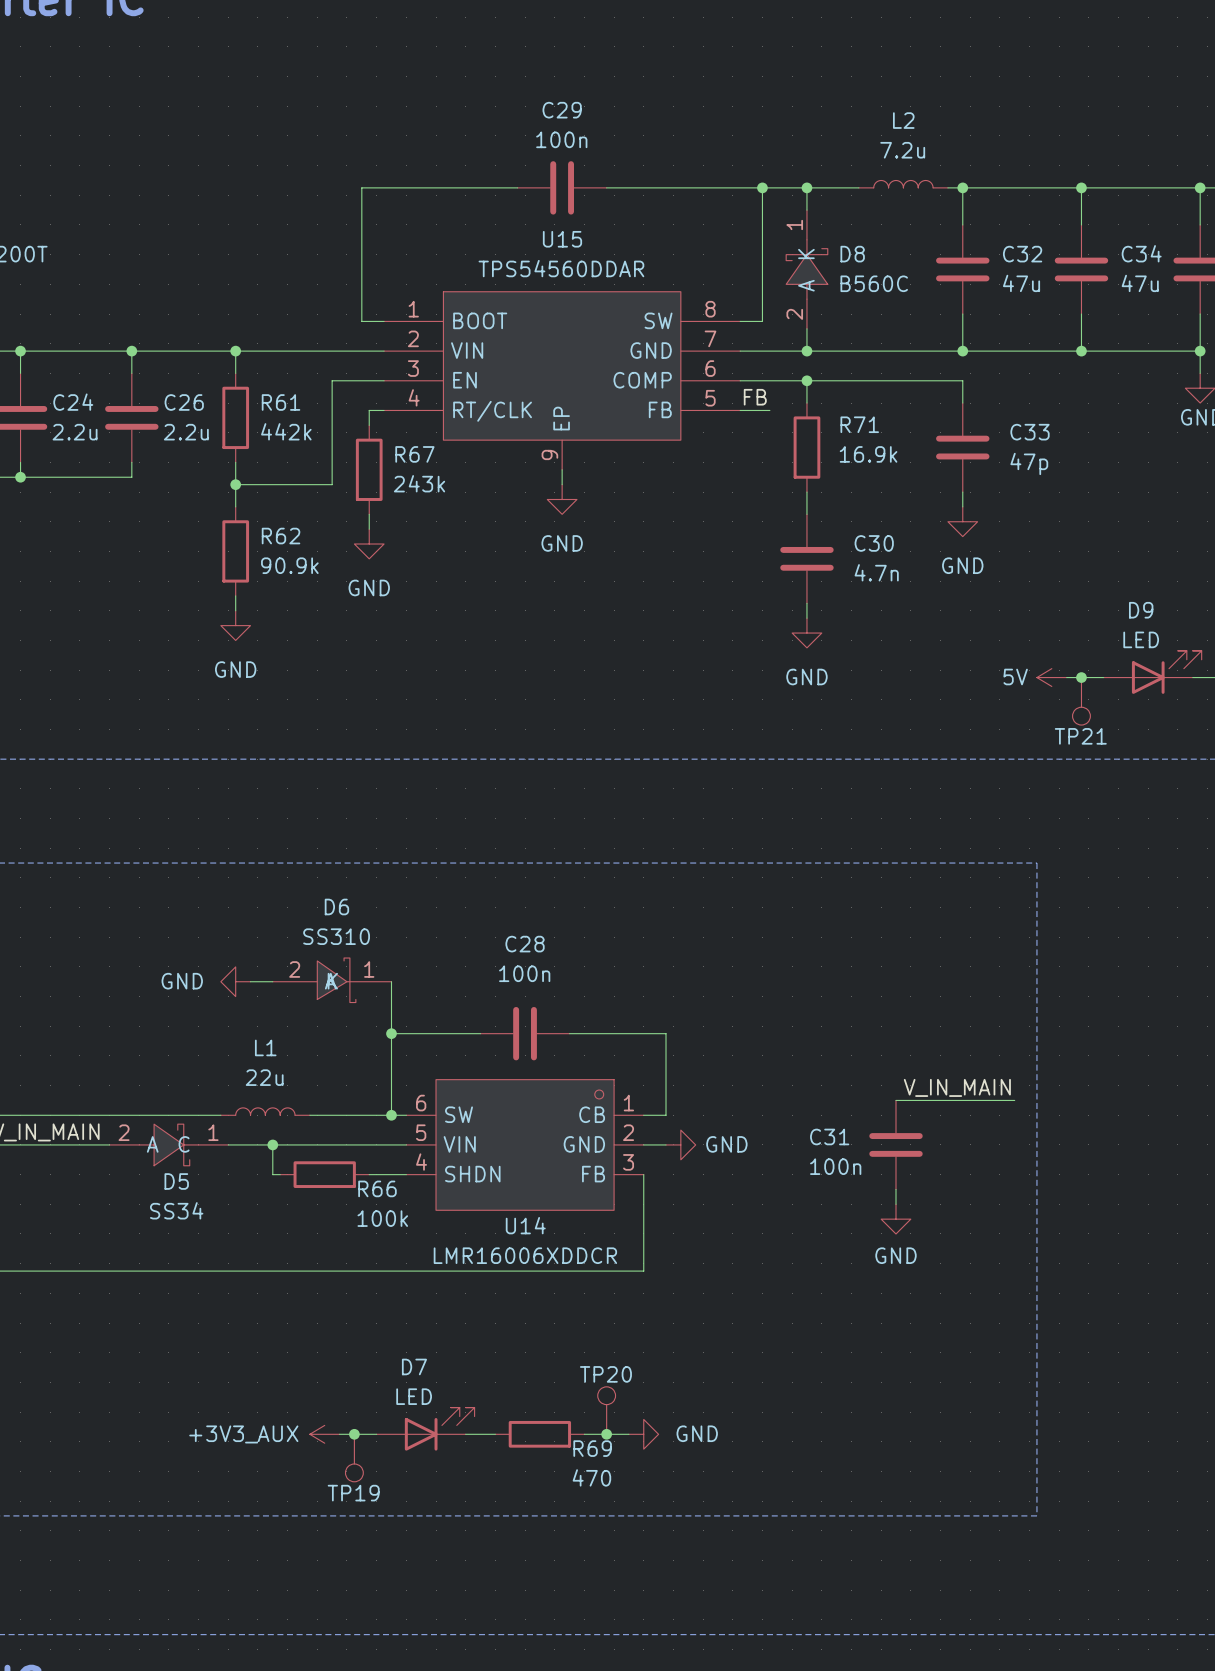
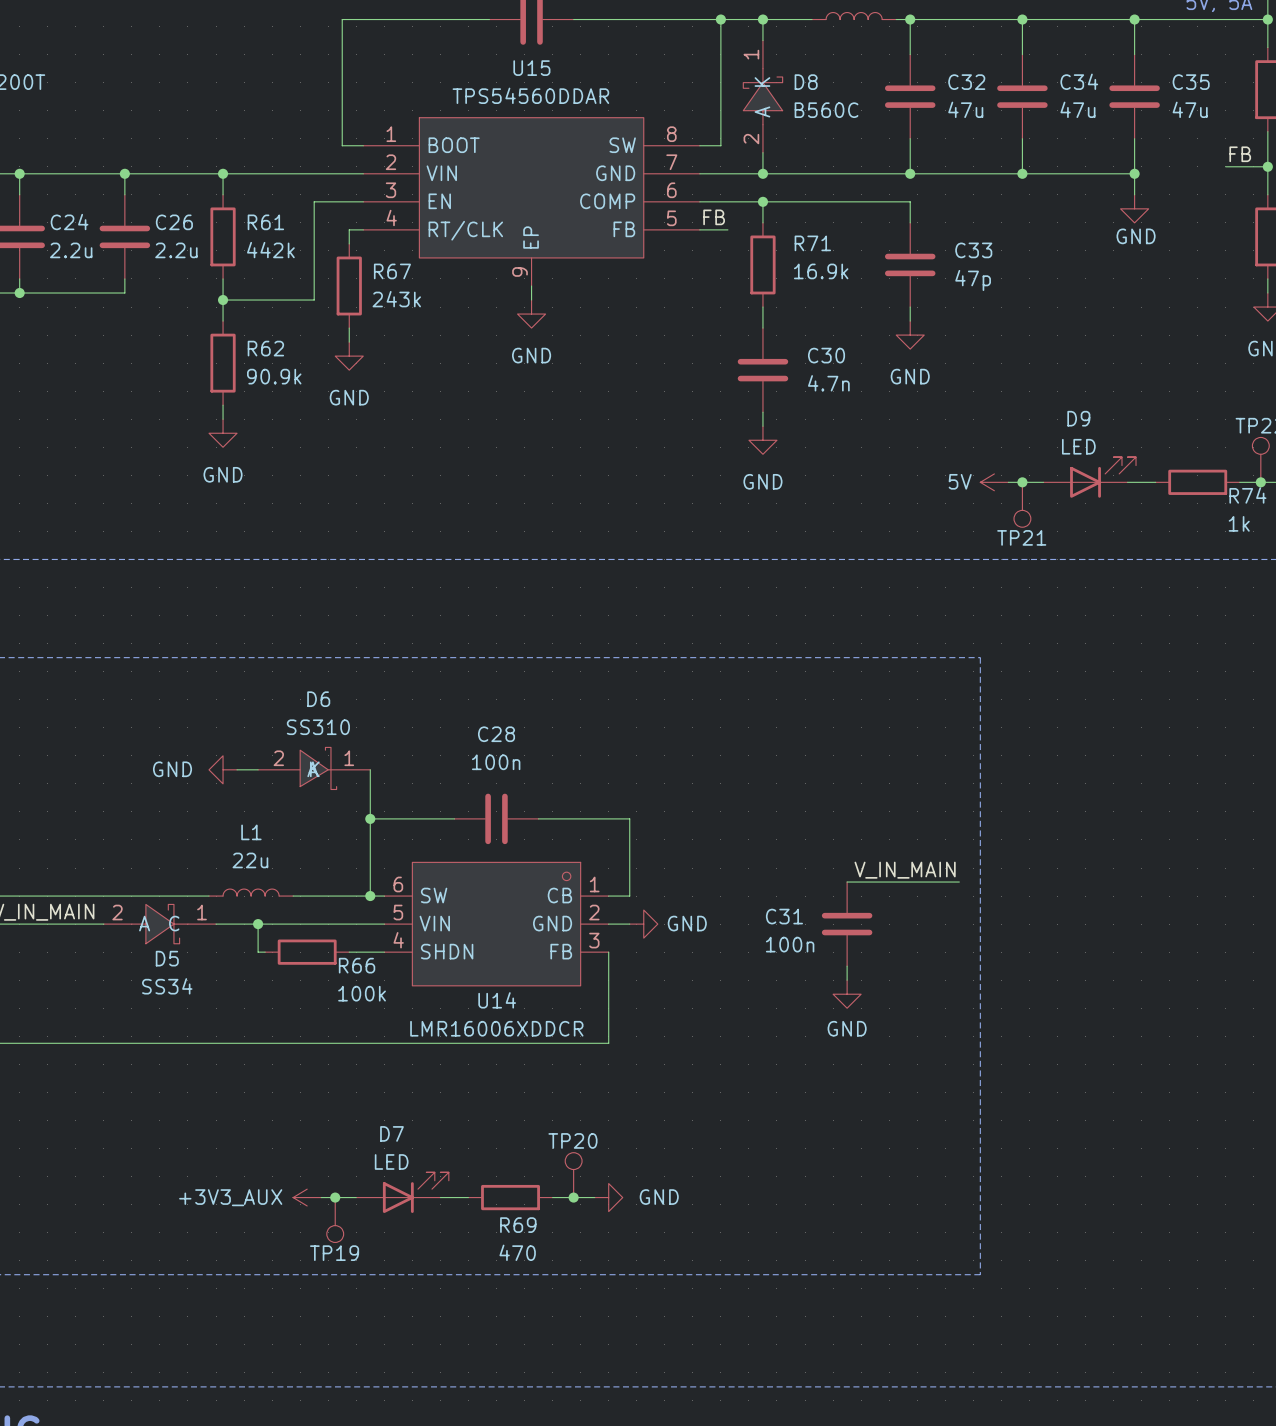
R69 name position: R69 (592, 1448) -> R69 (518, 1225)
R69 value position: 470 (591, 1477) -> 470 (517, 1252)

